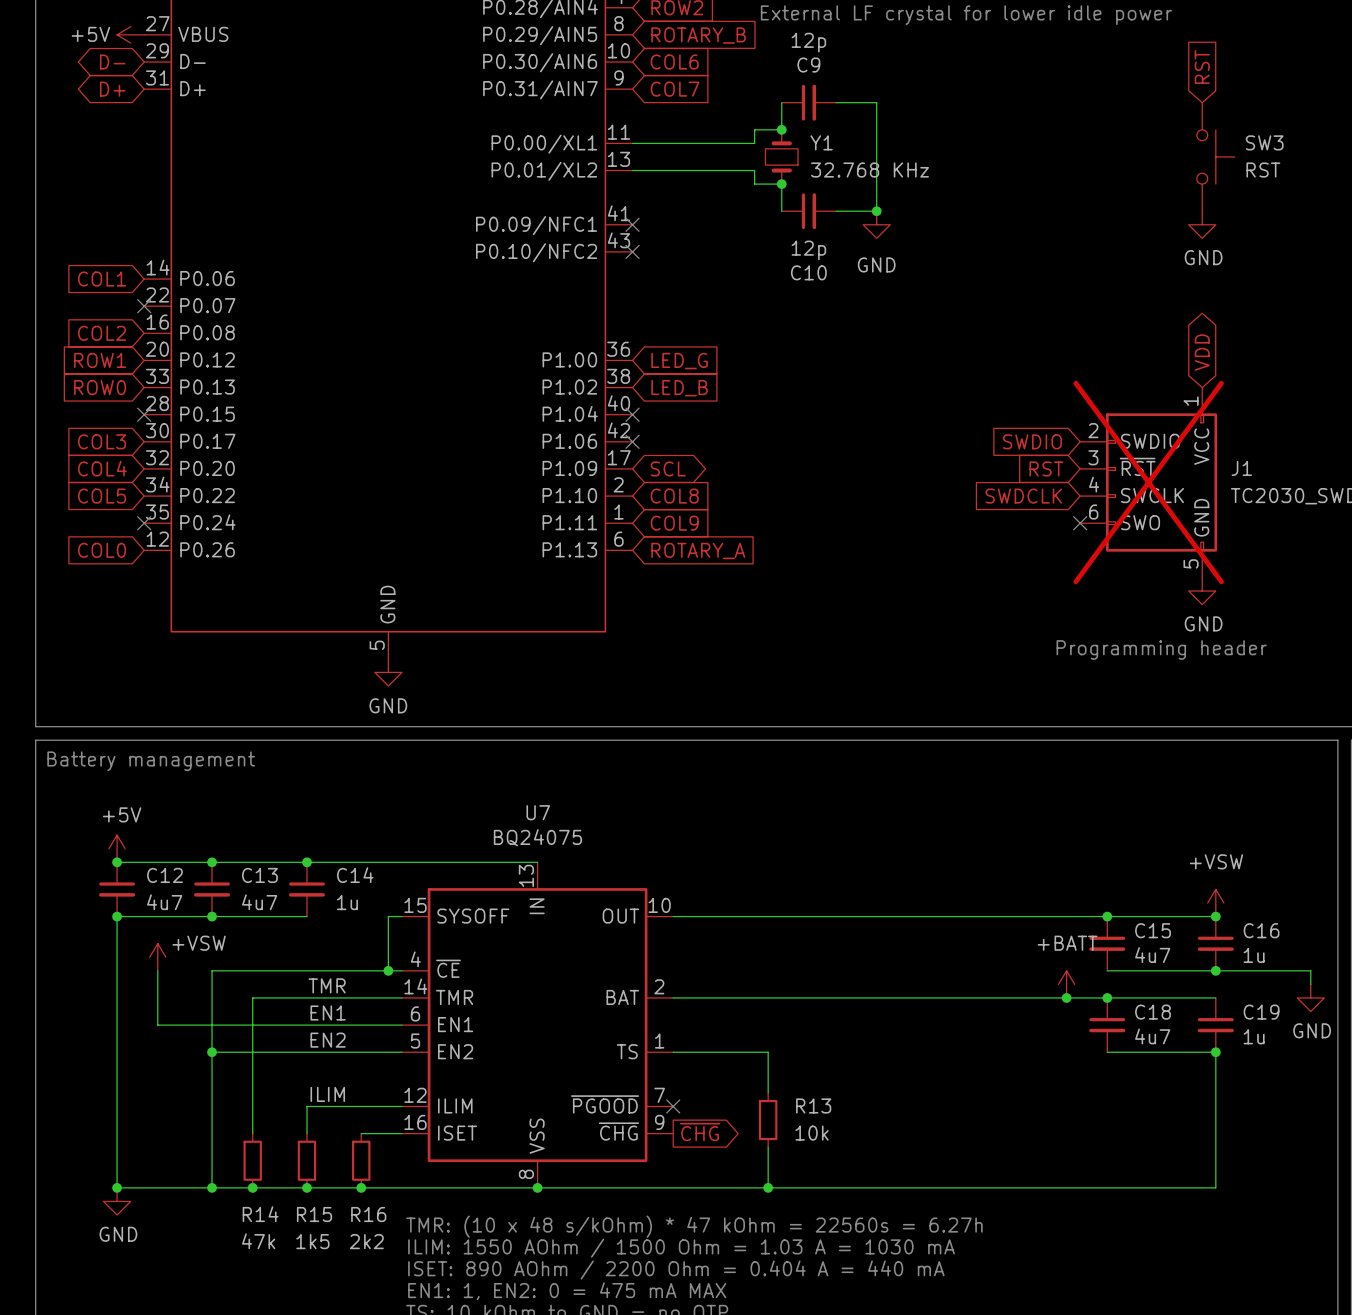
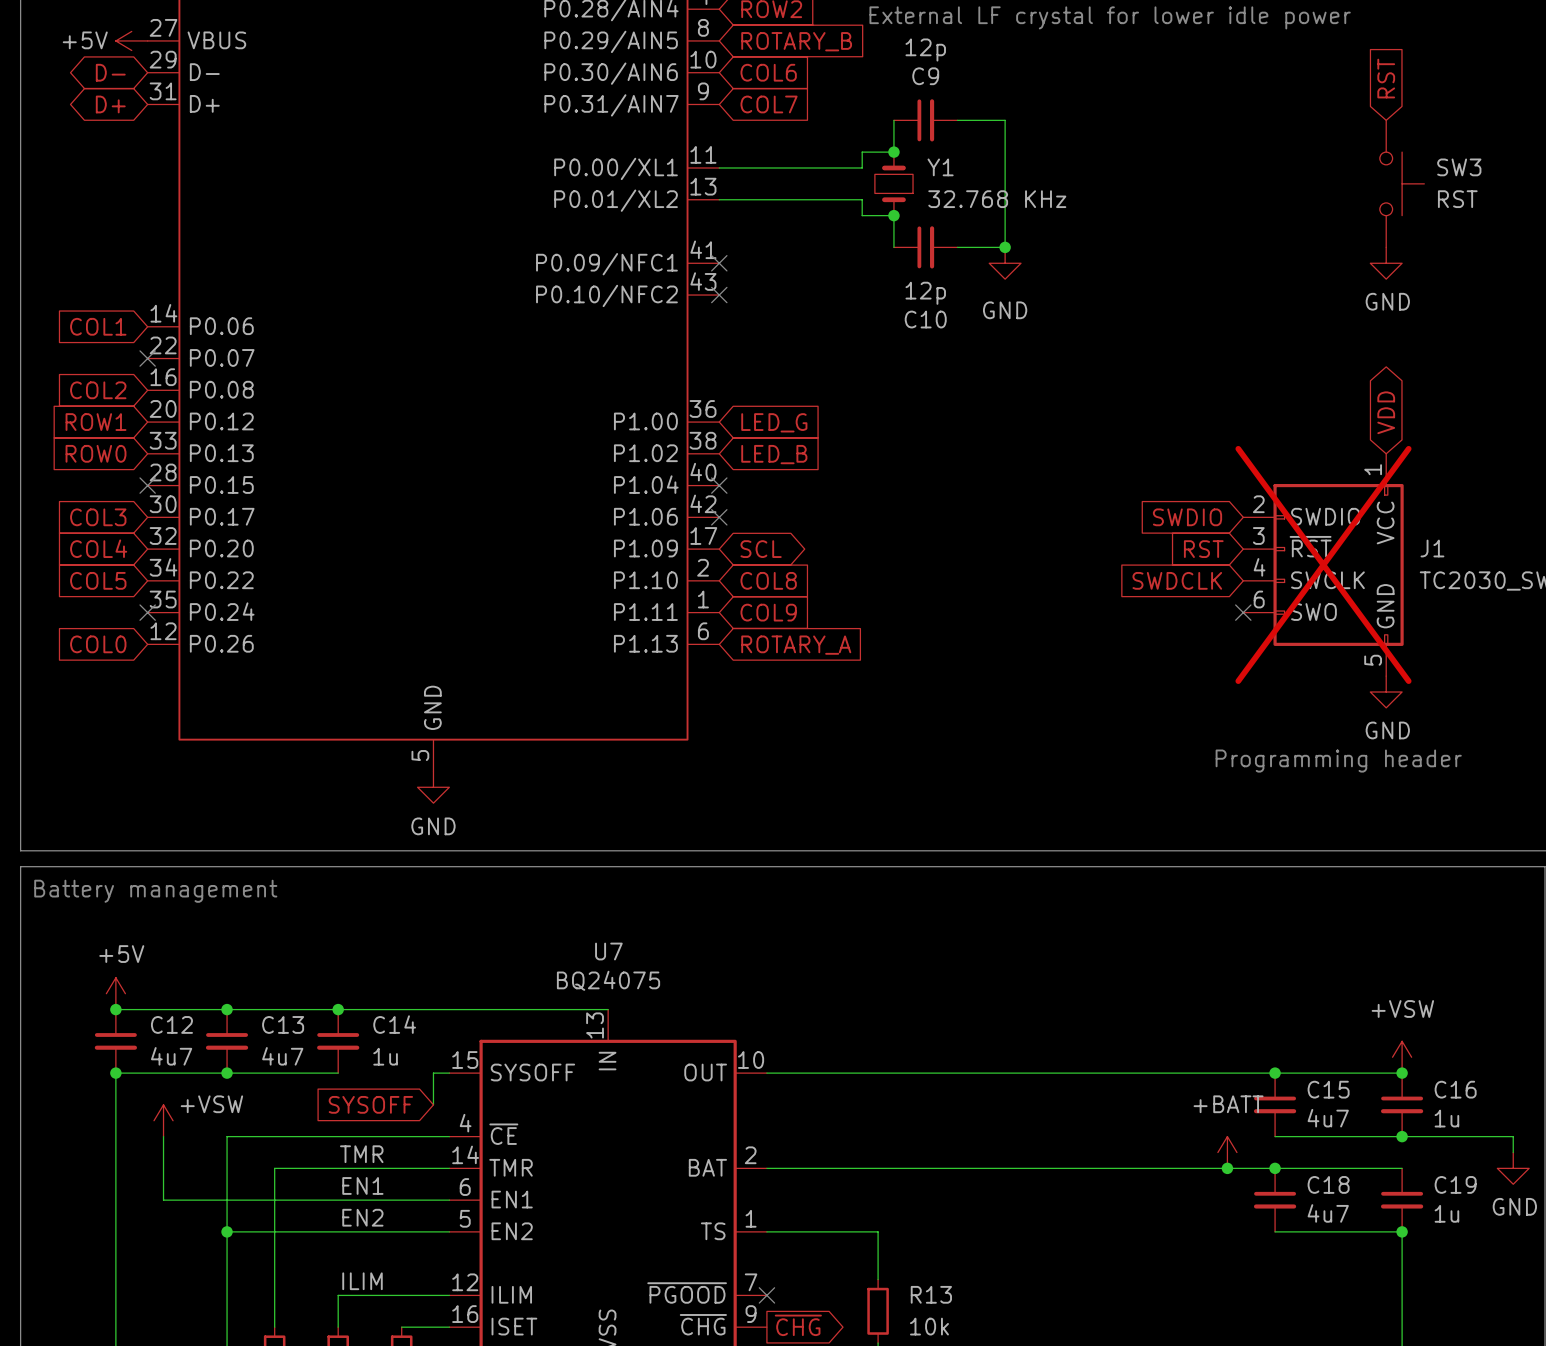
global label: none -> SYSOFF (370, 1104)
wire: (388, 943) (388, 970) -> none
junction: (388, 970) -> none

